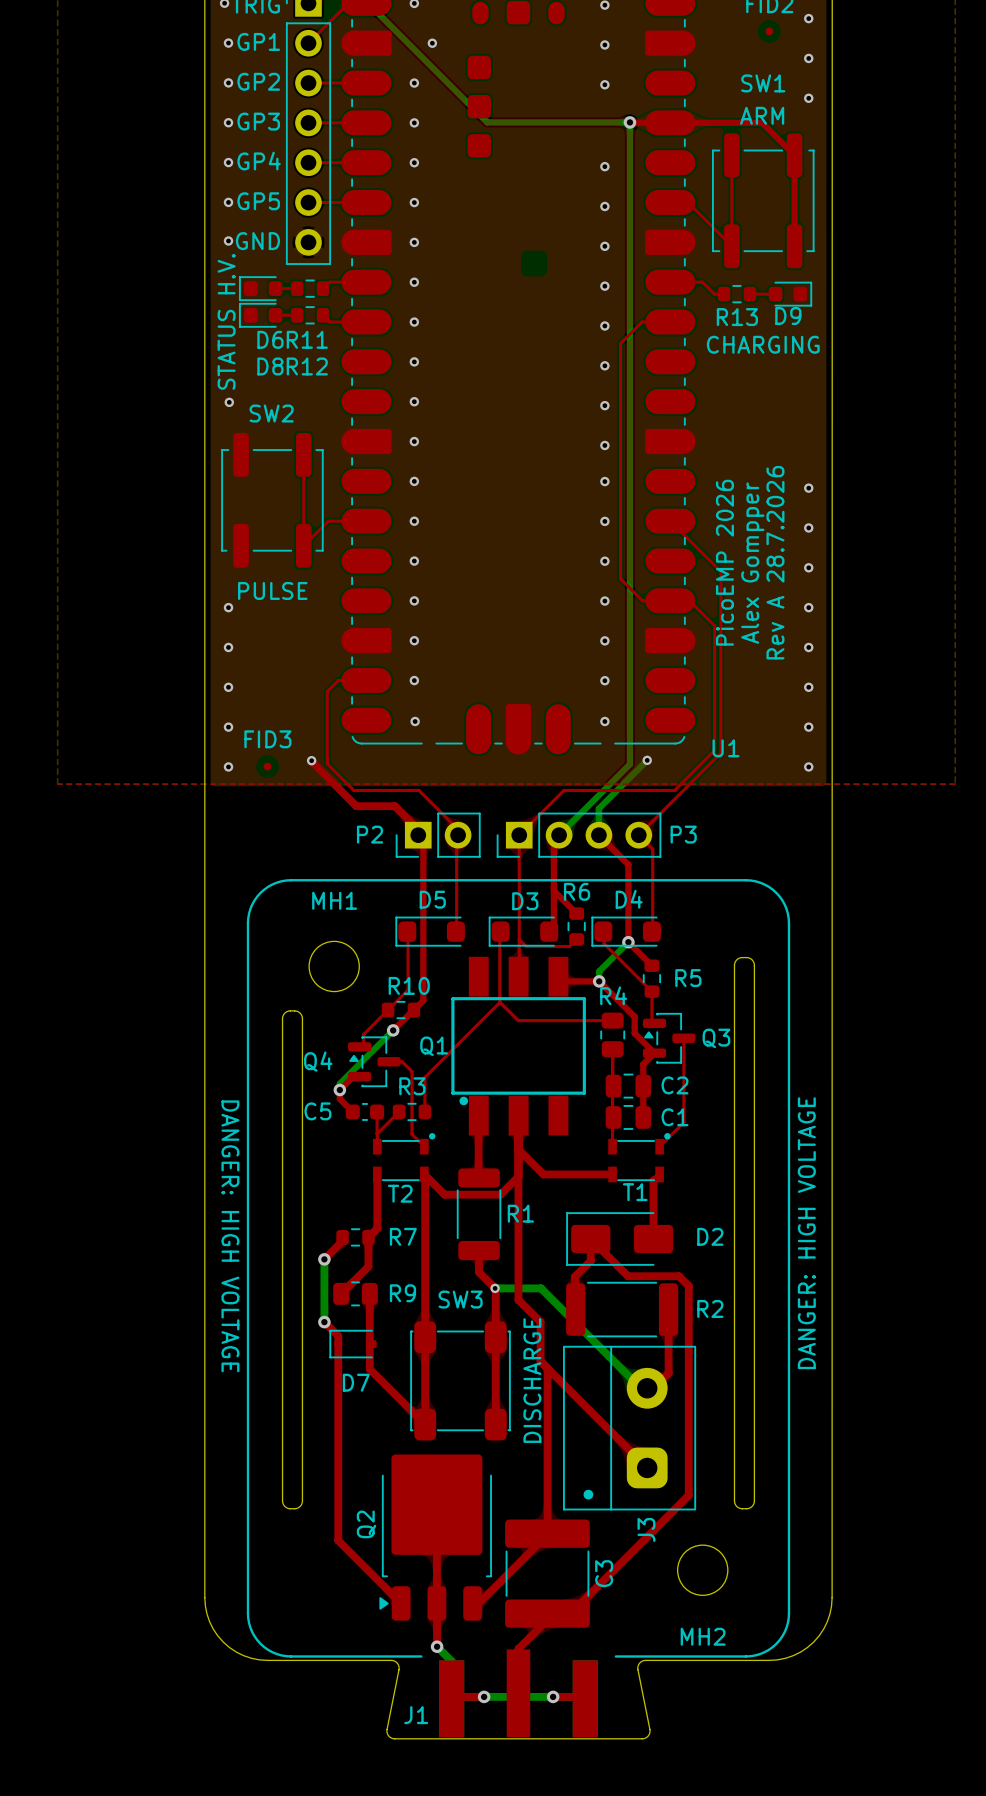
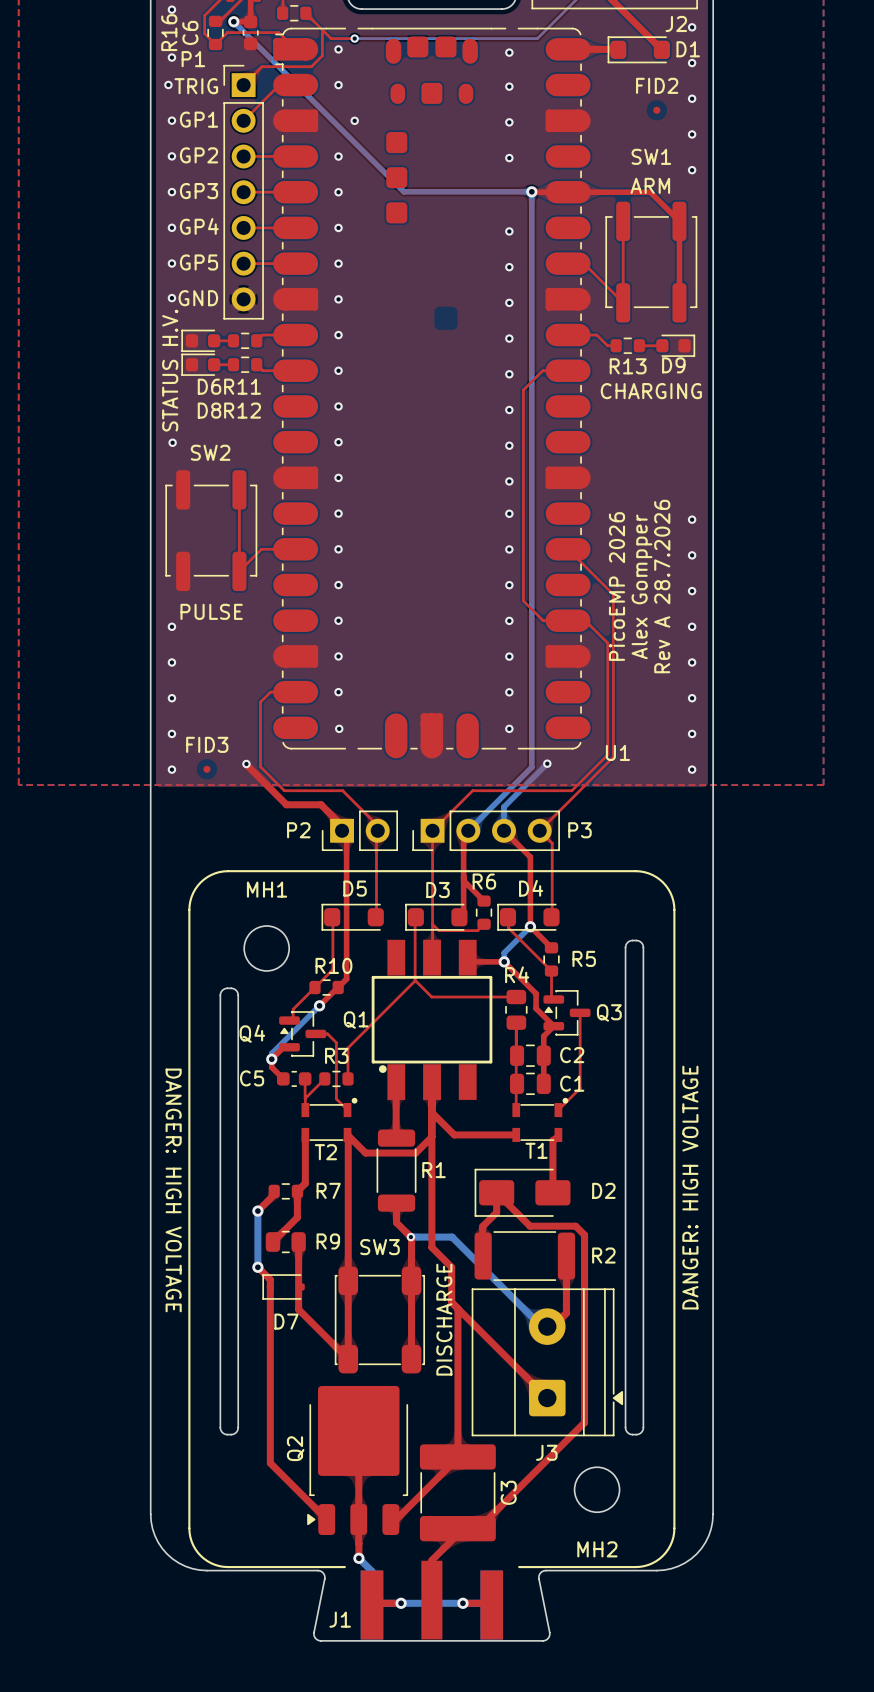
J3 footprint: [563, 1345, 697, 1511] -> [471, 1288, 624, 1437]

